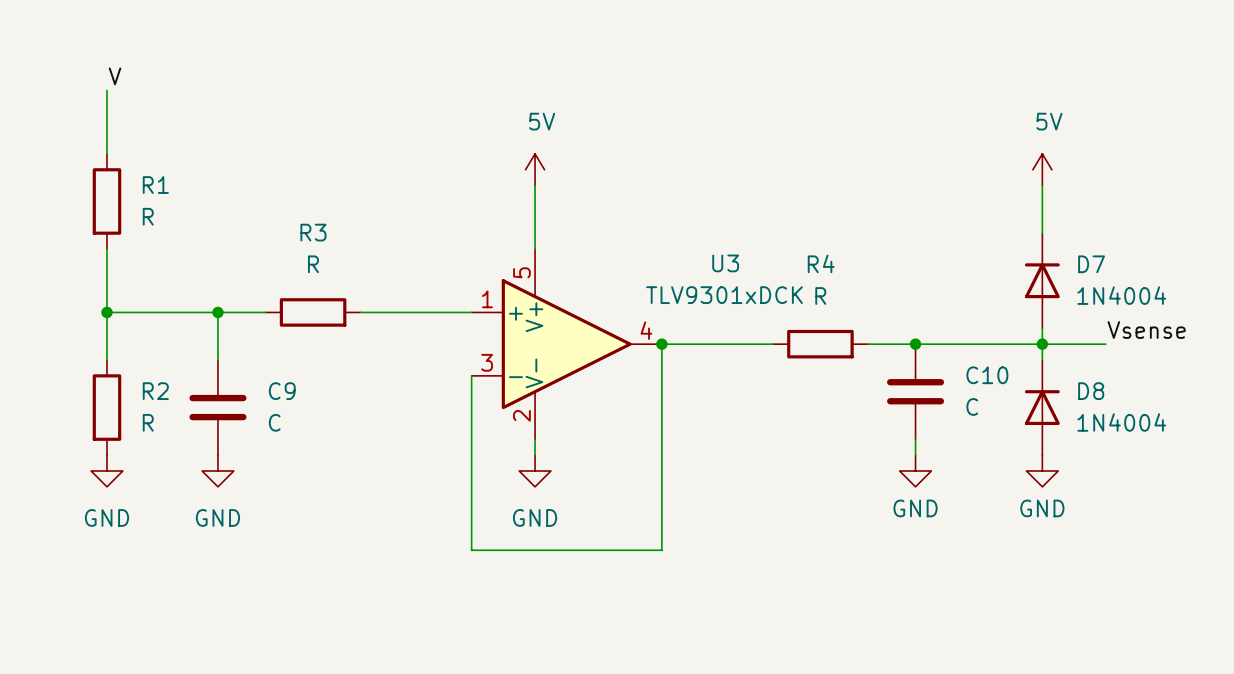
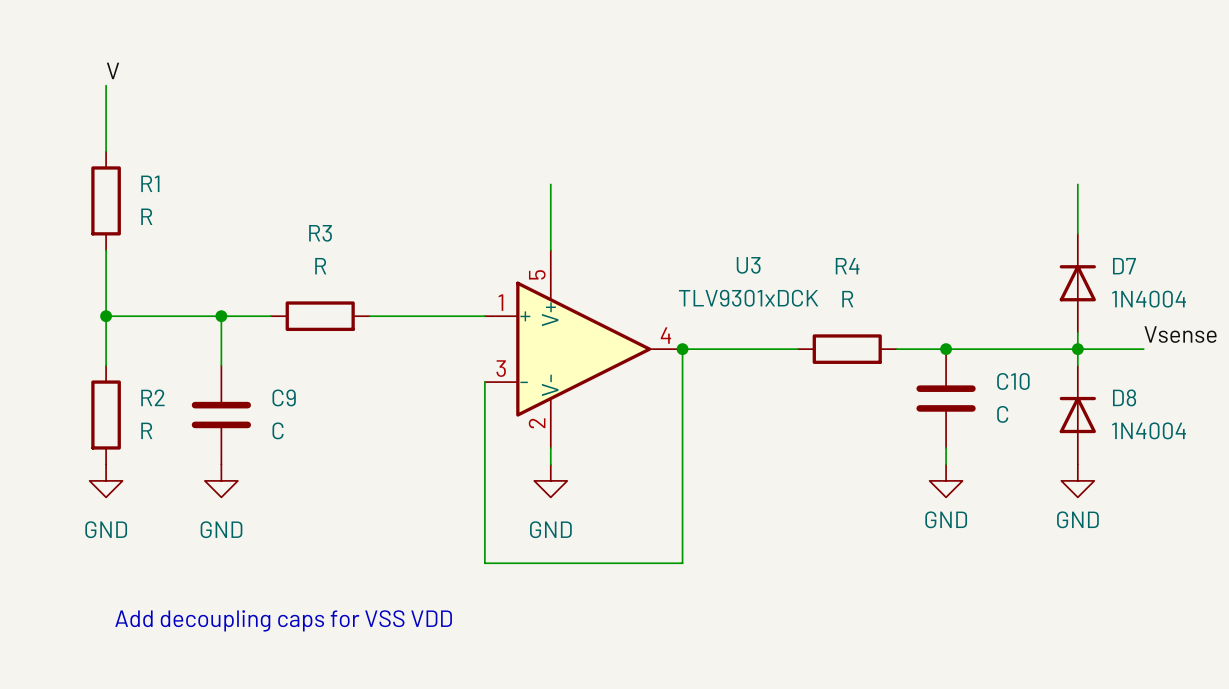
power symbol: 5V (535, 169) -> none
power symbol: 5V (1042, 169) -> none
text: none -> Add decoupling caps for VSS VDD (283, 620)

